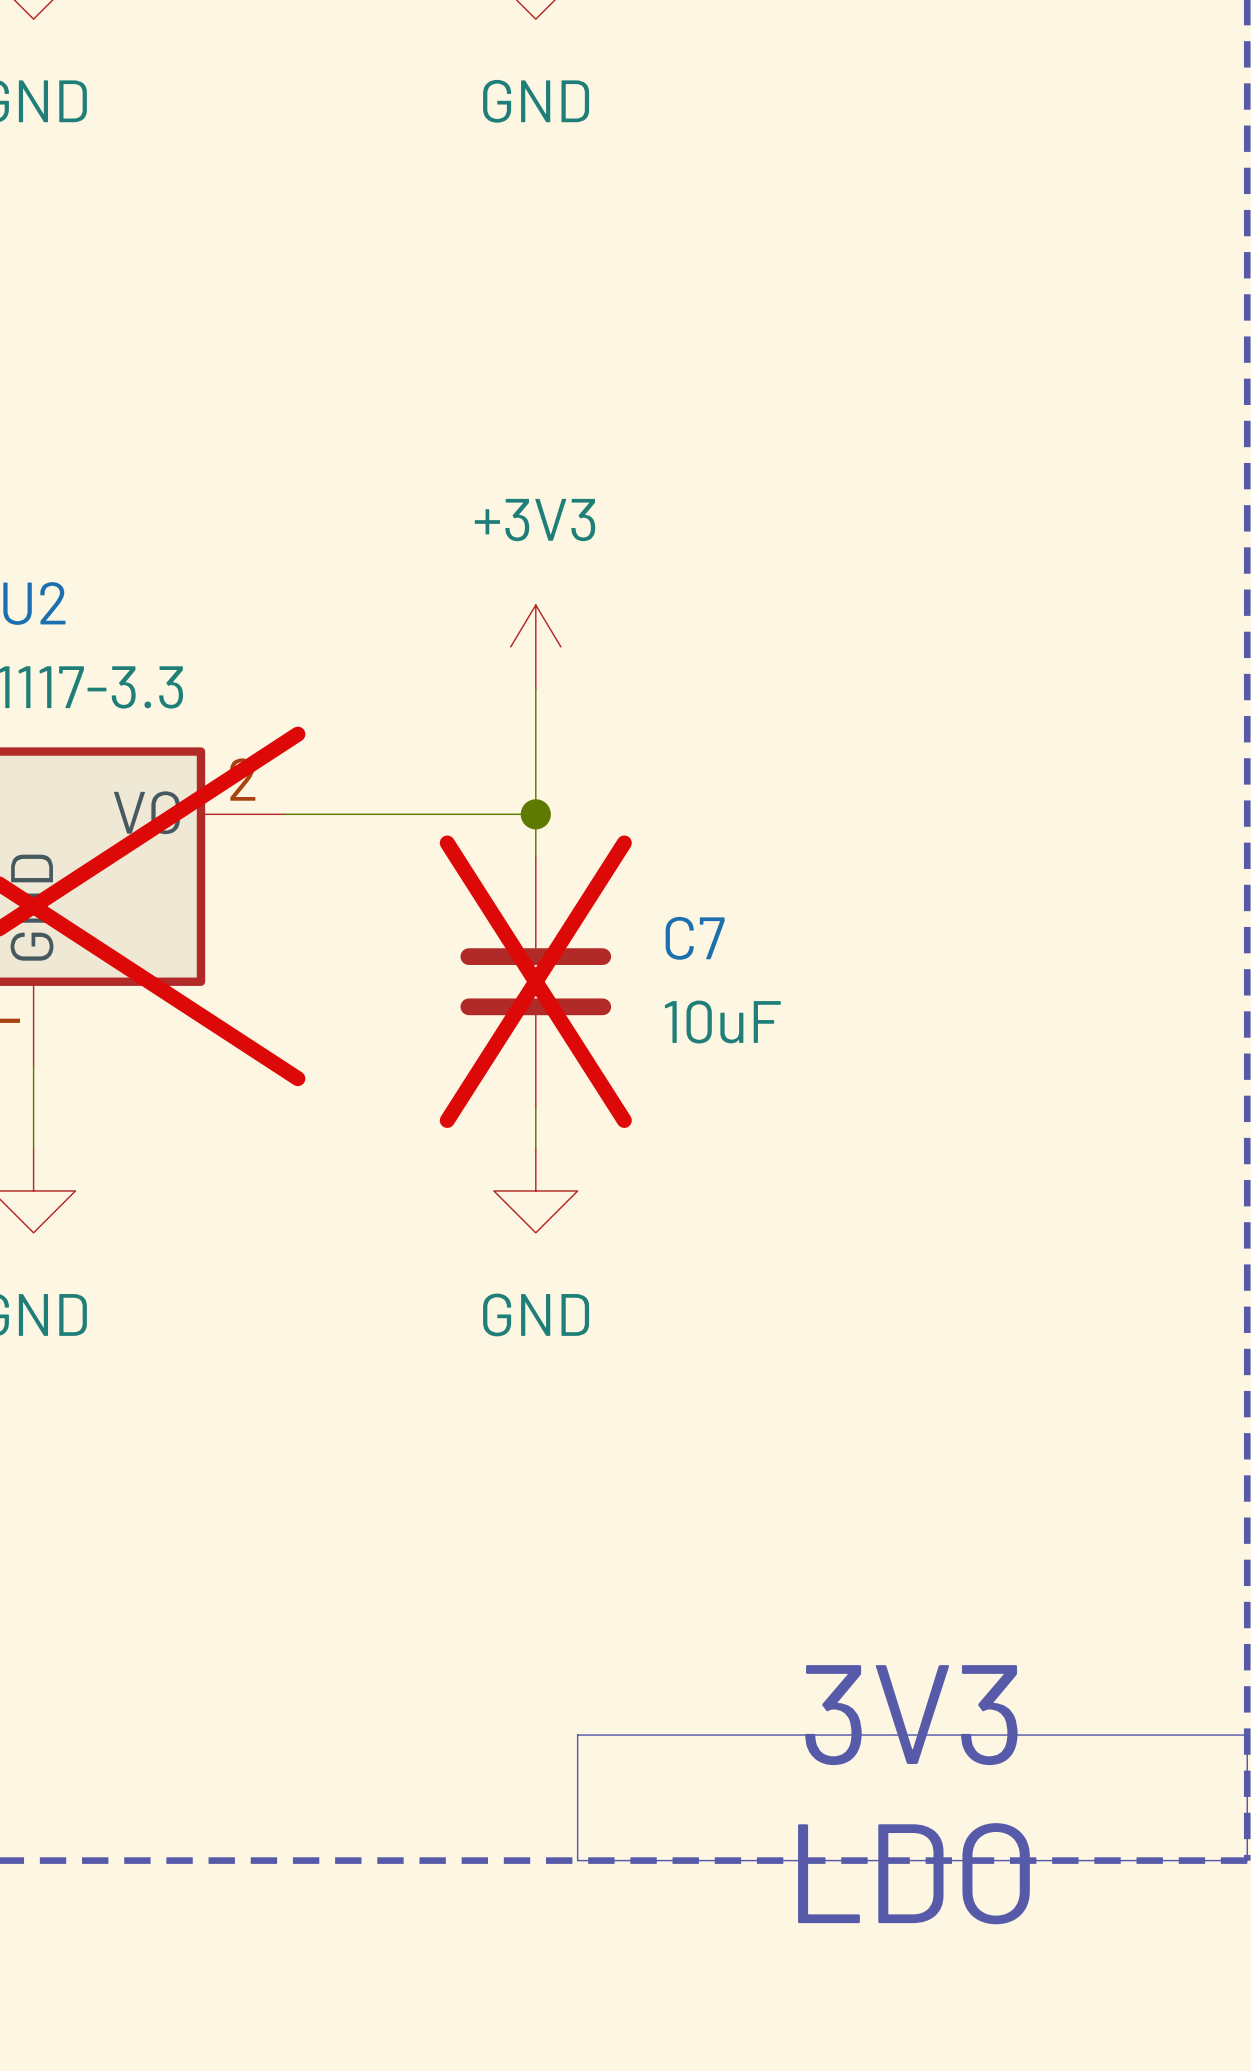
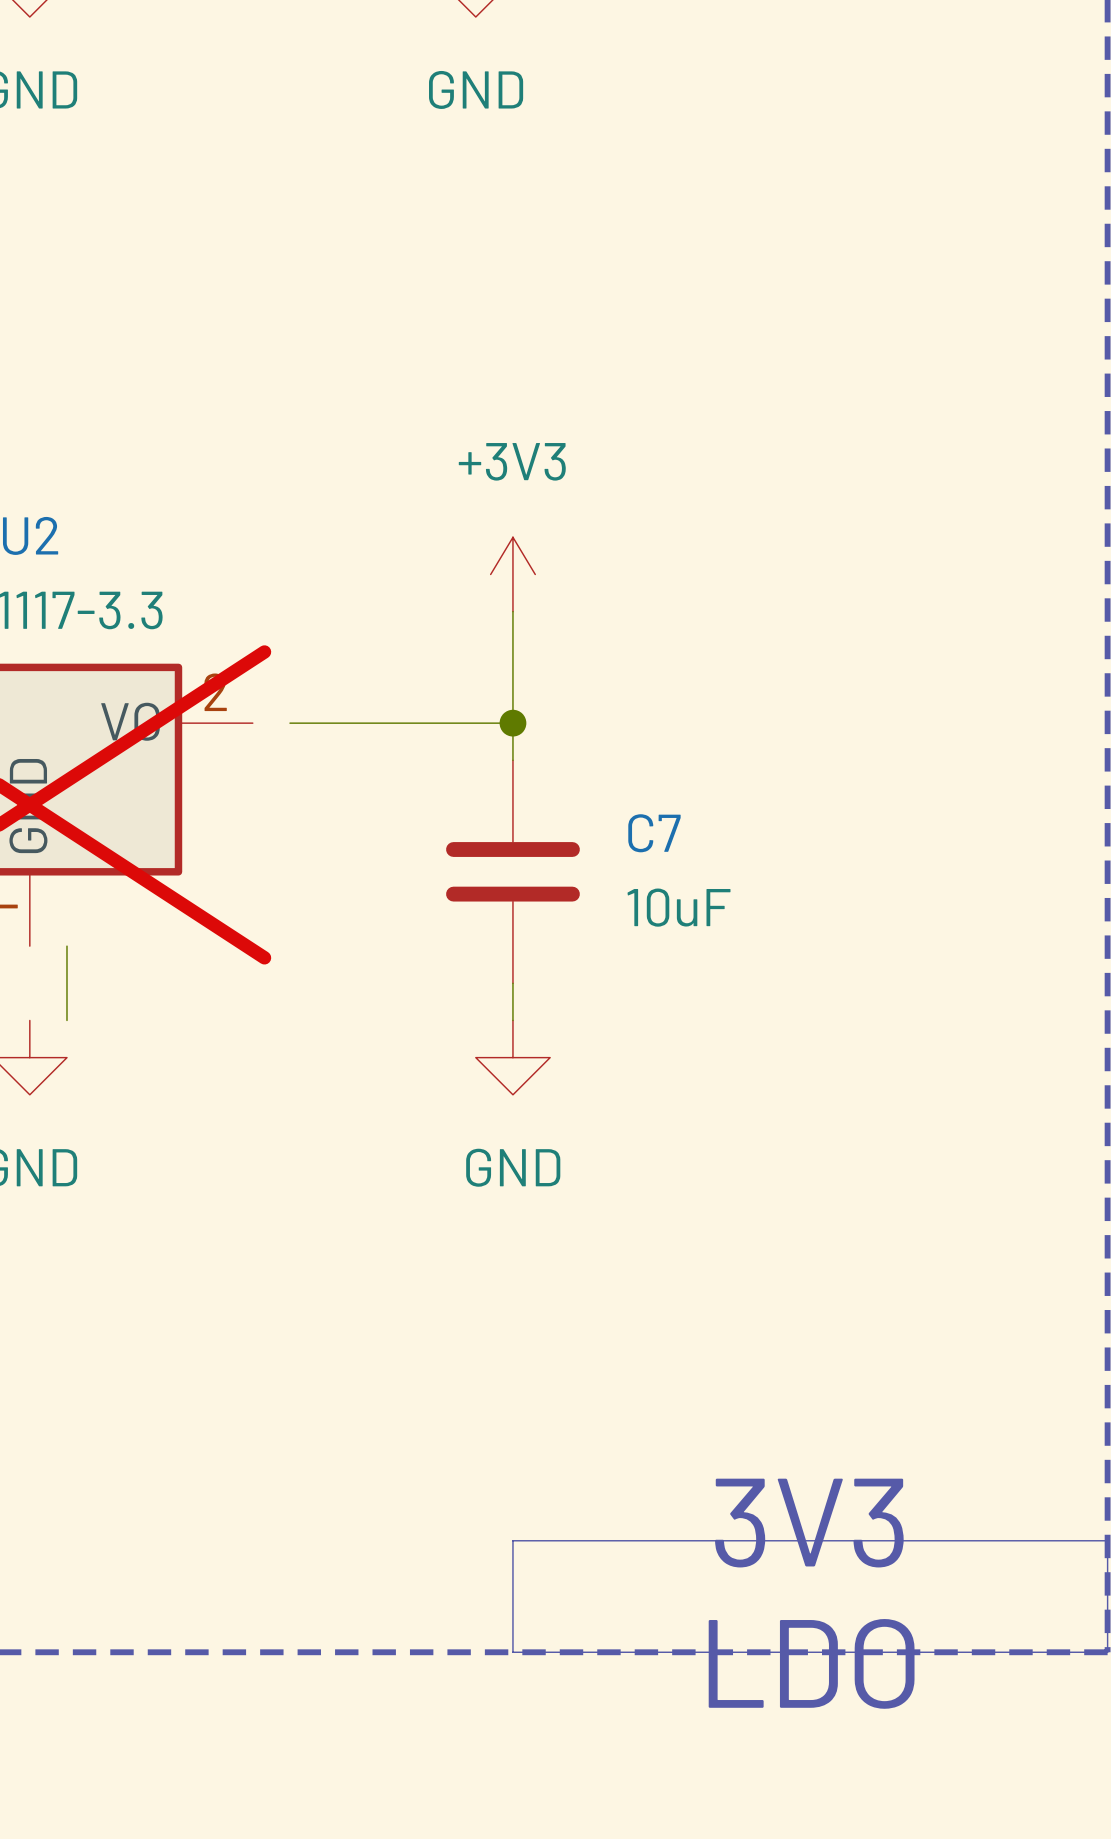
power symbol position: +3V3 (535, 646) -> +3V3 (512, 574)
wire: (535, 688) (535, 856) -> (512, 611) (512, 760)
wire: (284, 814) (326, 814) -> (475, 723) (512, 723)
junction position: (535, 814) -> (512, 723)
C7 position: (535, 981) -> (512, 871)
C7 do-not-place cross: (535, 981) -> none
wire: (33, 1065) (33, 1149) -> (66, 946) (66, 1020)
wire: (535, 1107) (535, 1149) -> (512, 983) (512, 1020)
power symbol position: GND (535, 1190) -> GND (512, 1057)

